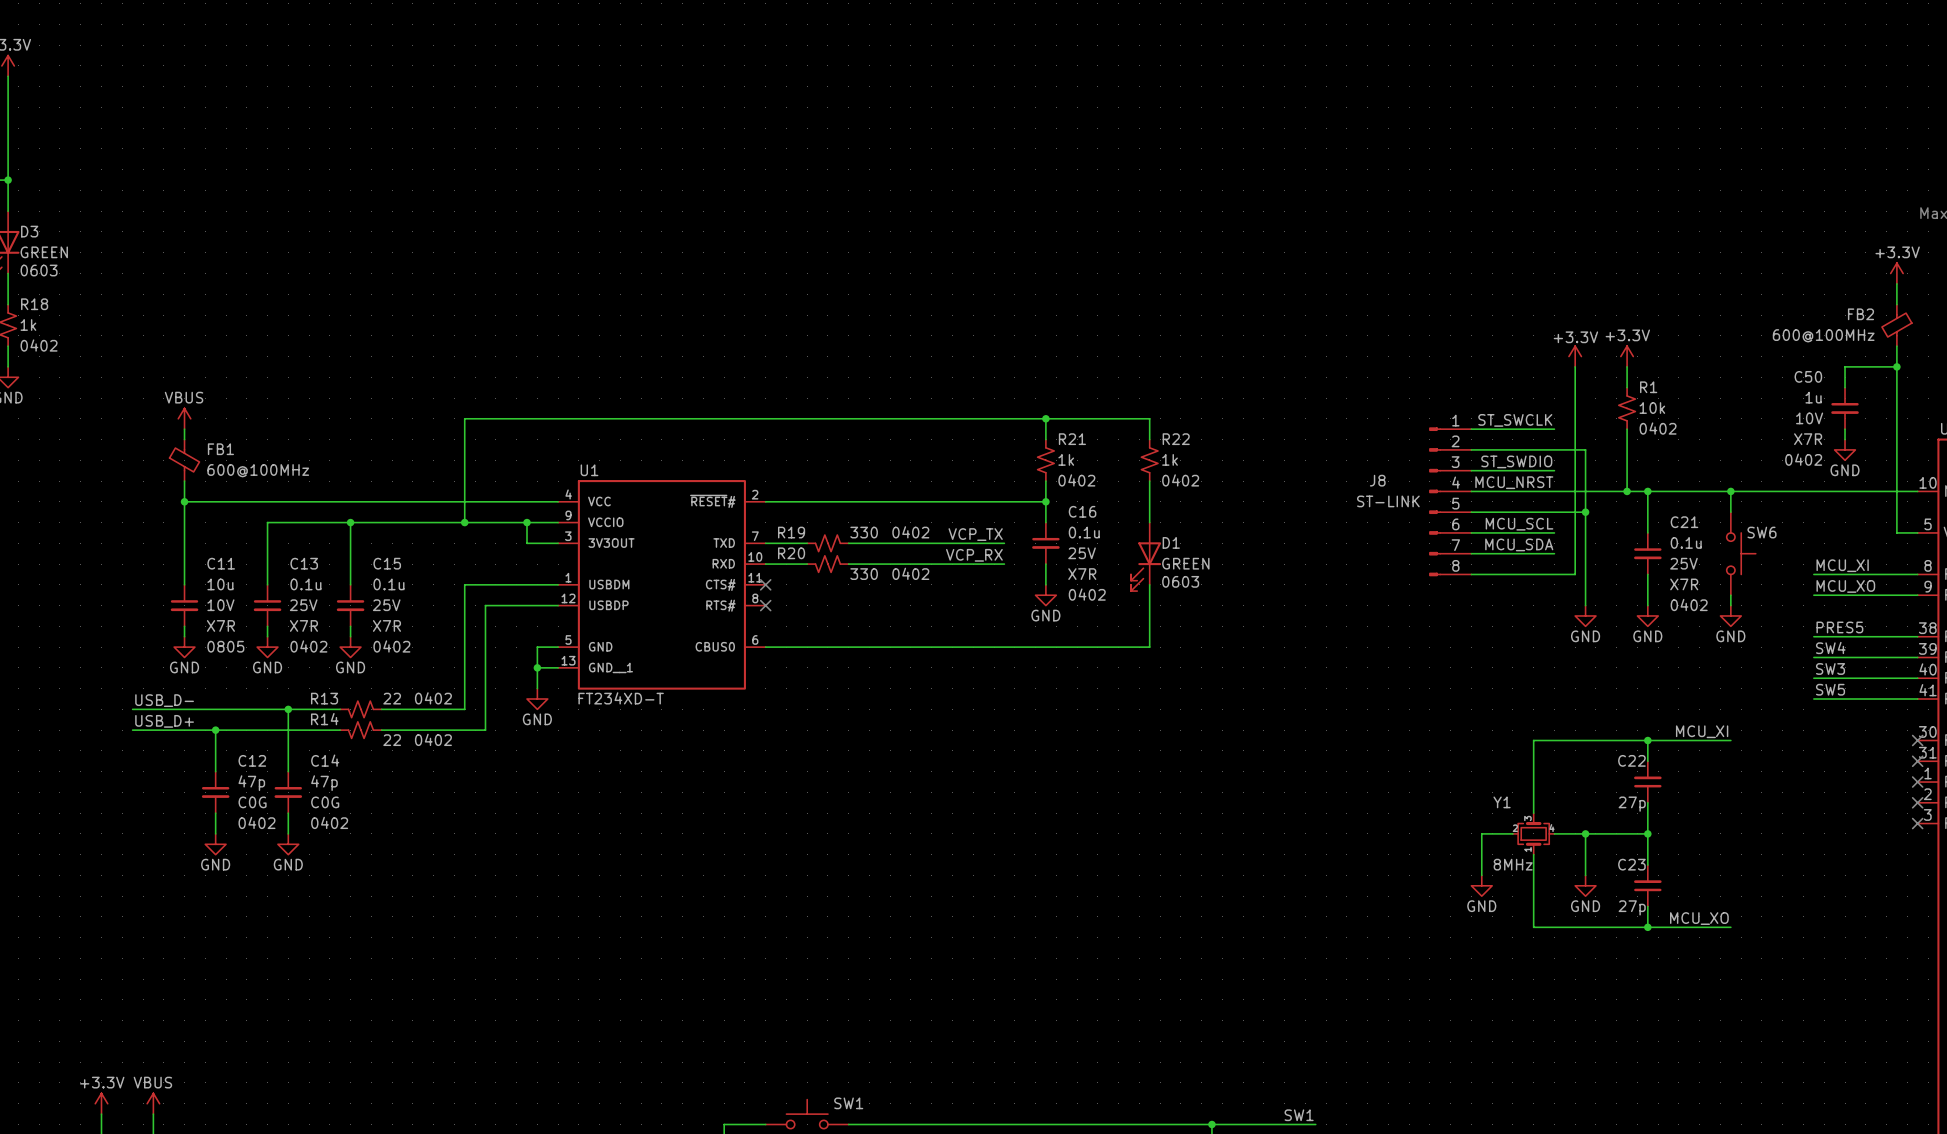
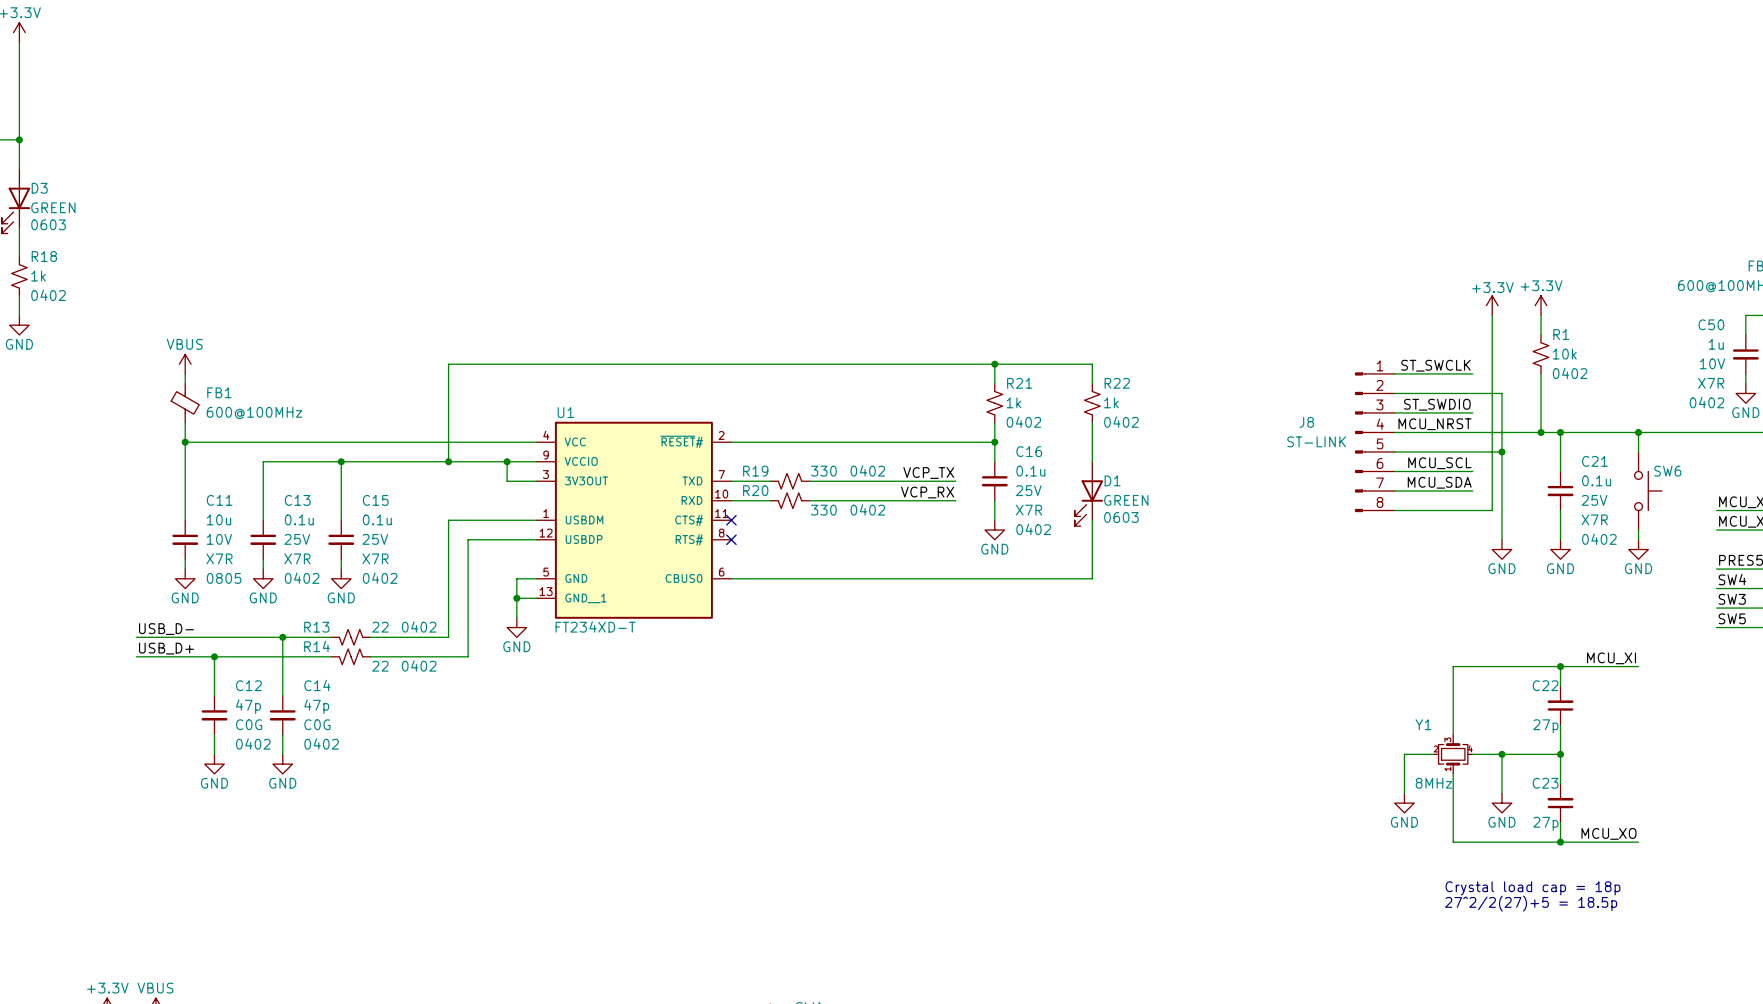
text: none -> Crystal load cap = 18p (1532, 888)
text: none -> 27^2/2(27)+5 = 18.5p (1531, 903)

